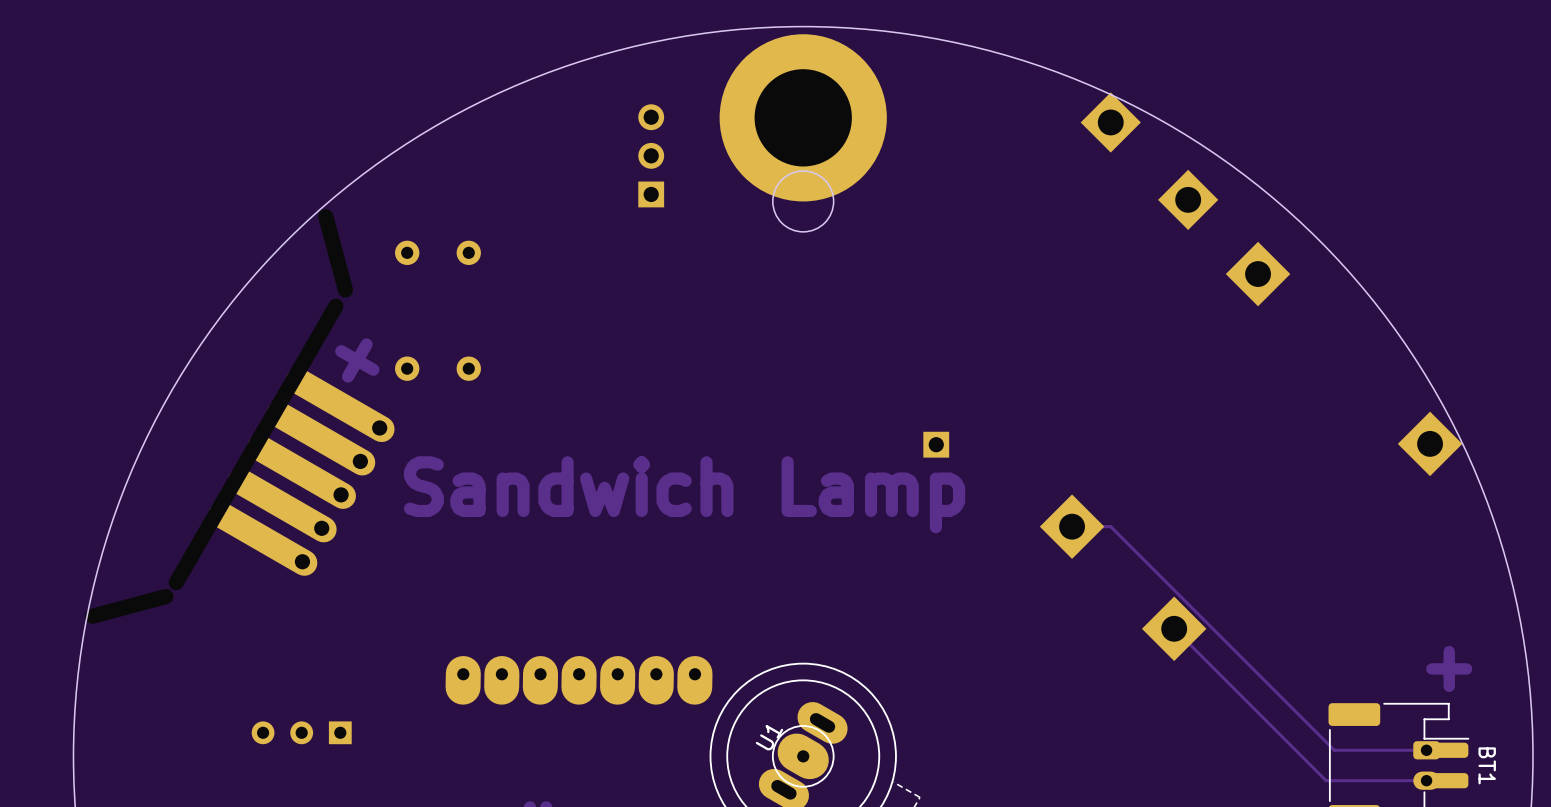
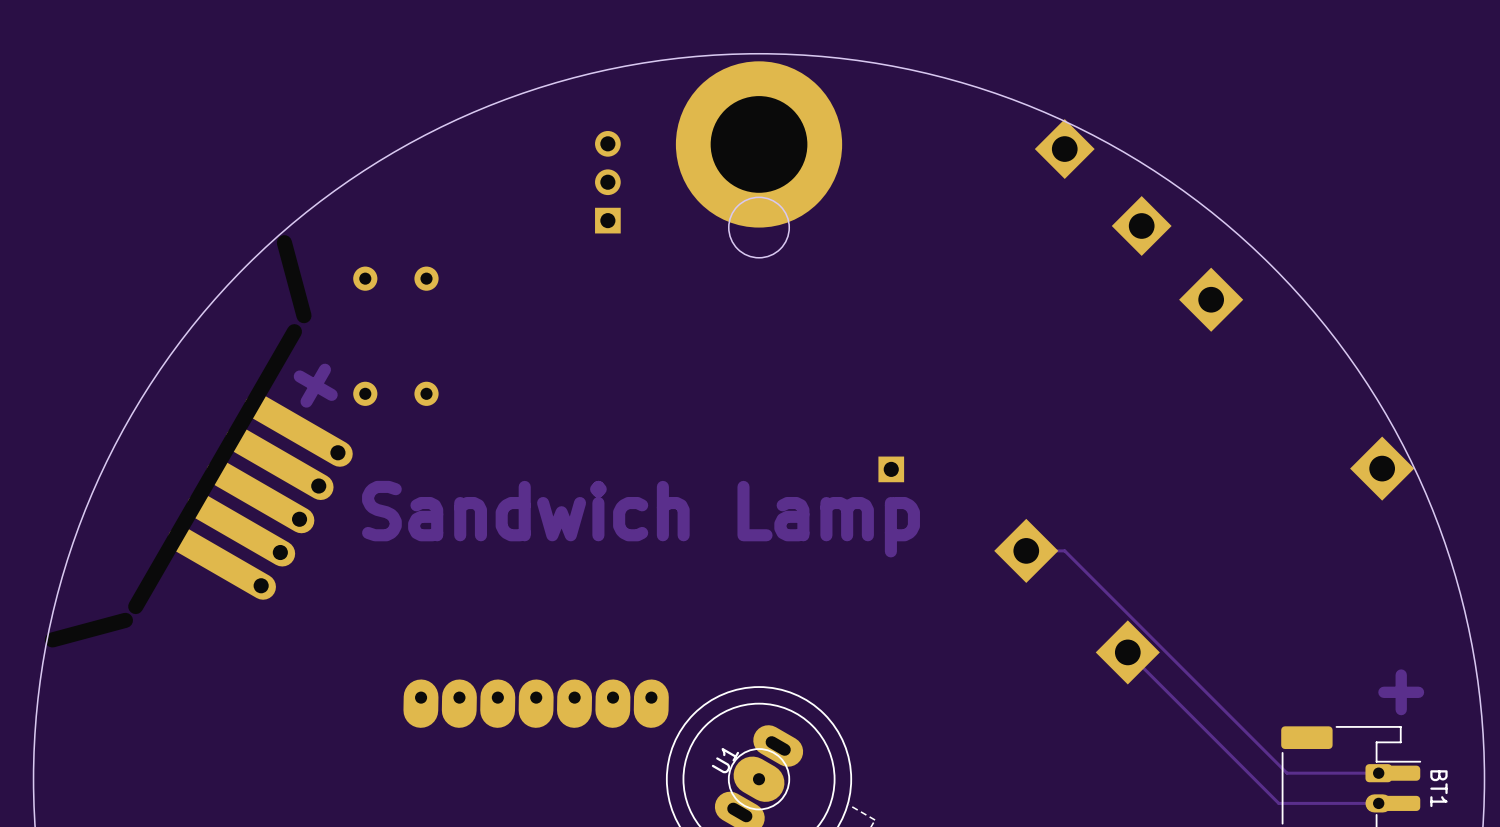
part: (301, 732) -> none

